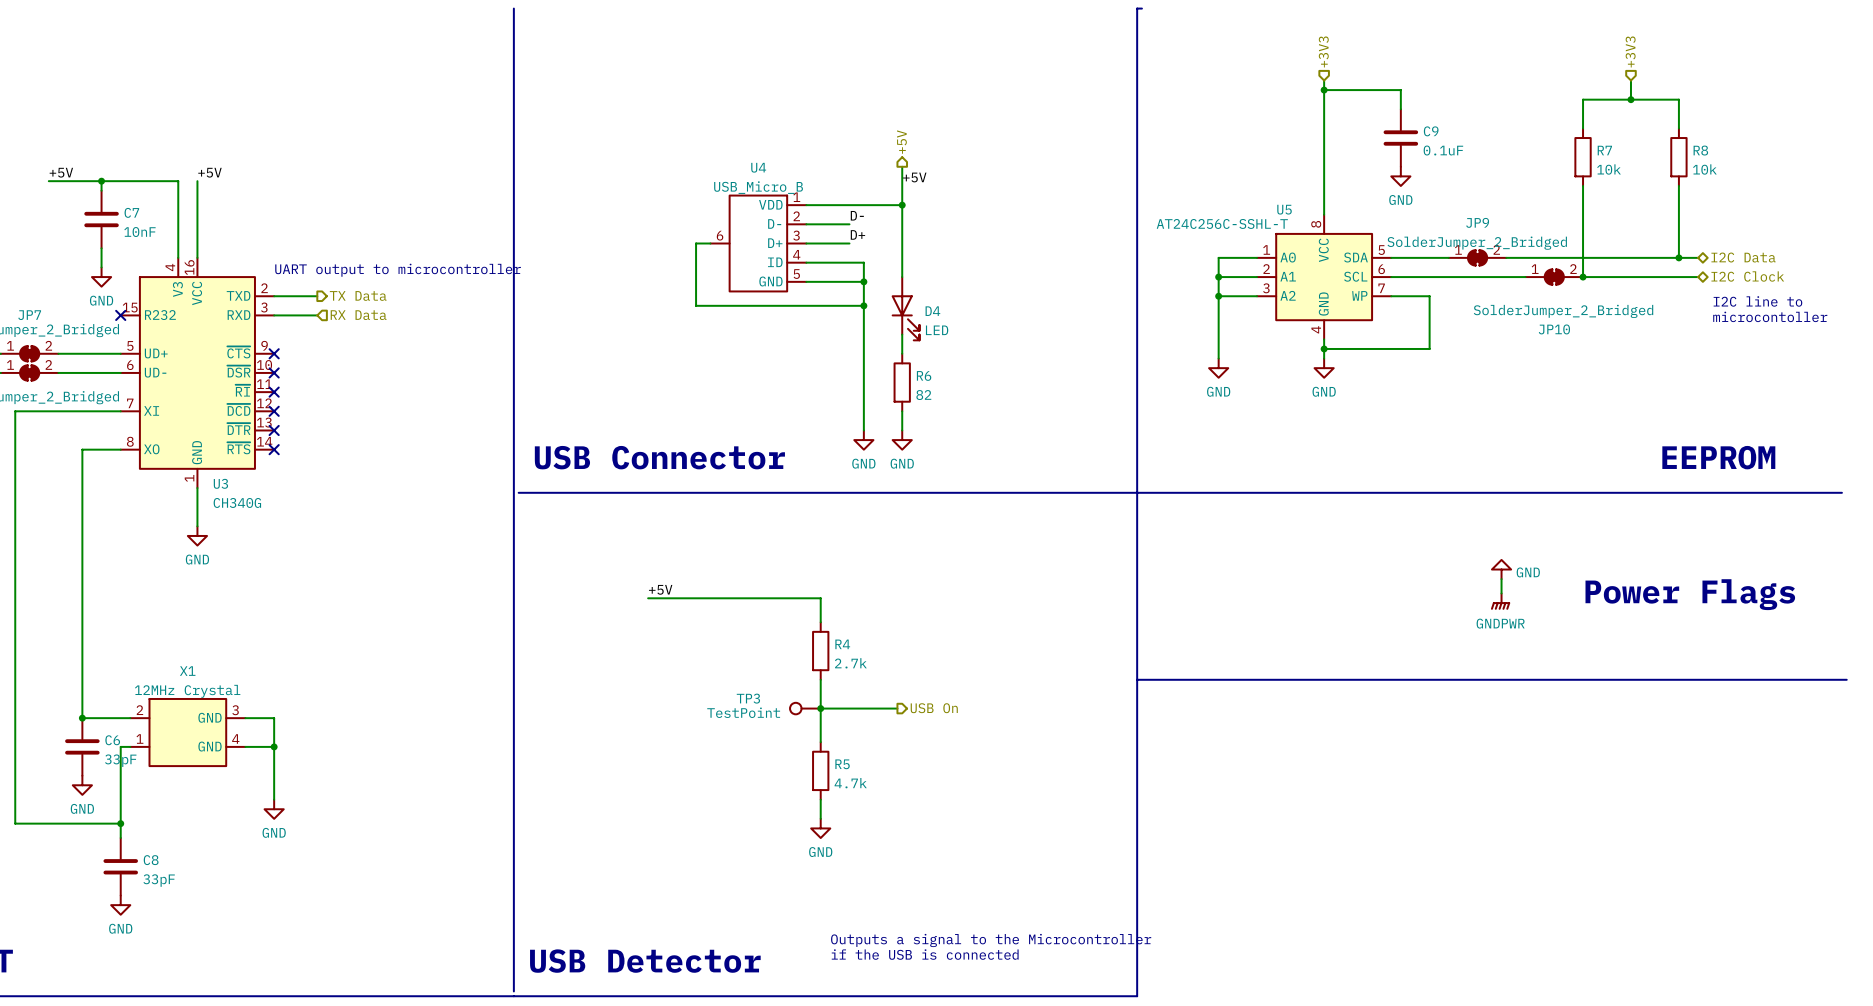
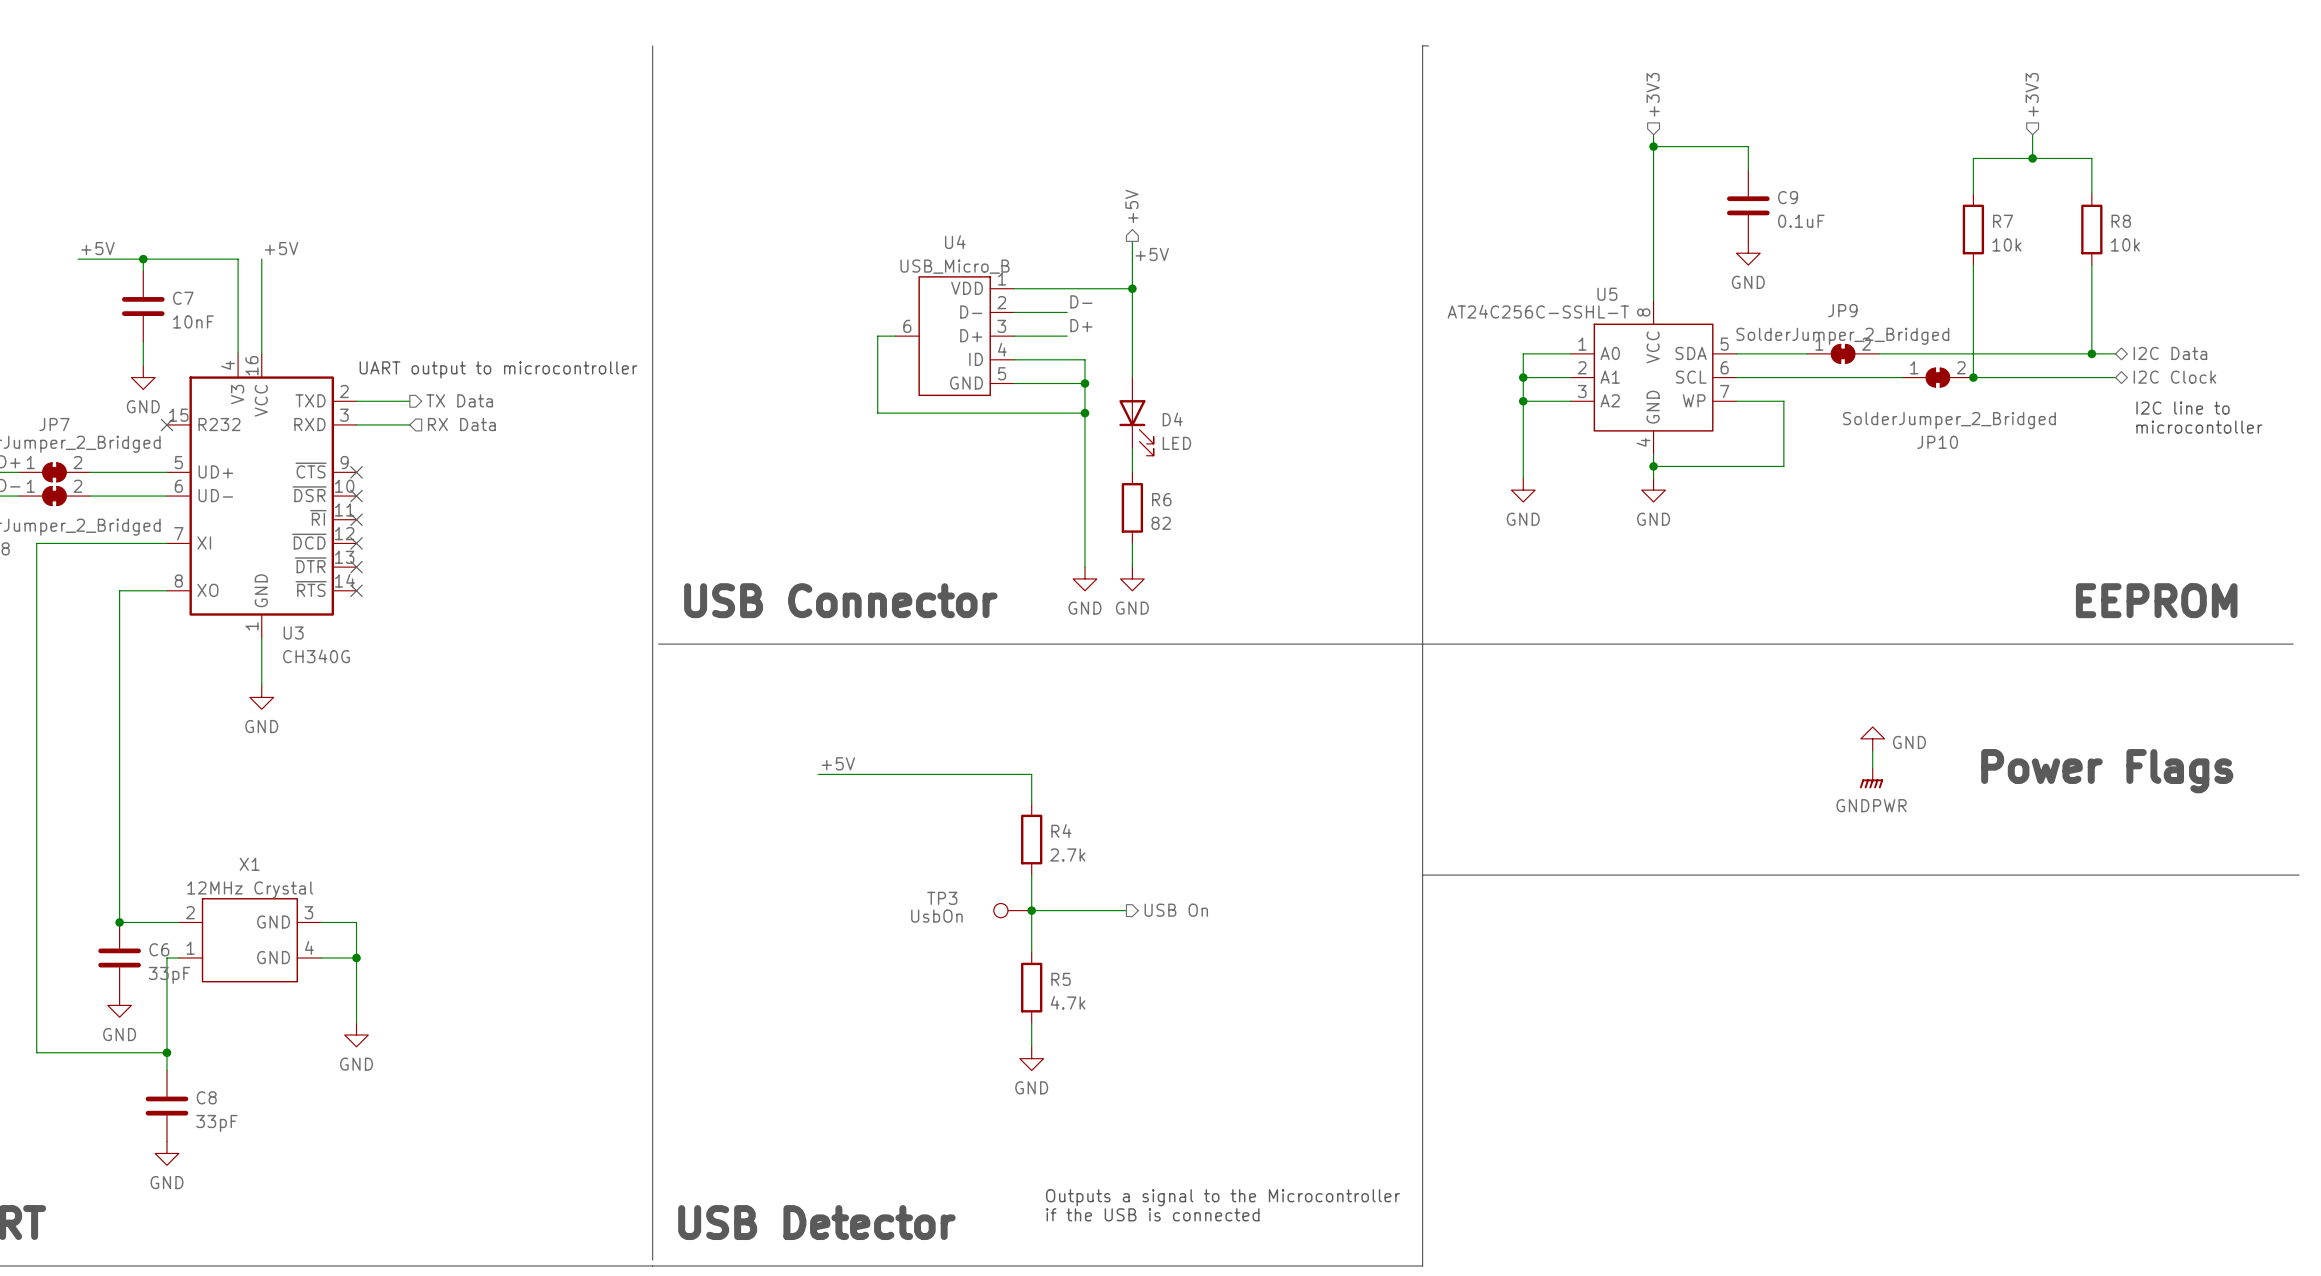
TP3 value: TestPoint (743, 712) -> UsbOn (936, 916)

